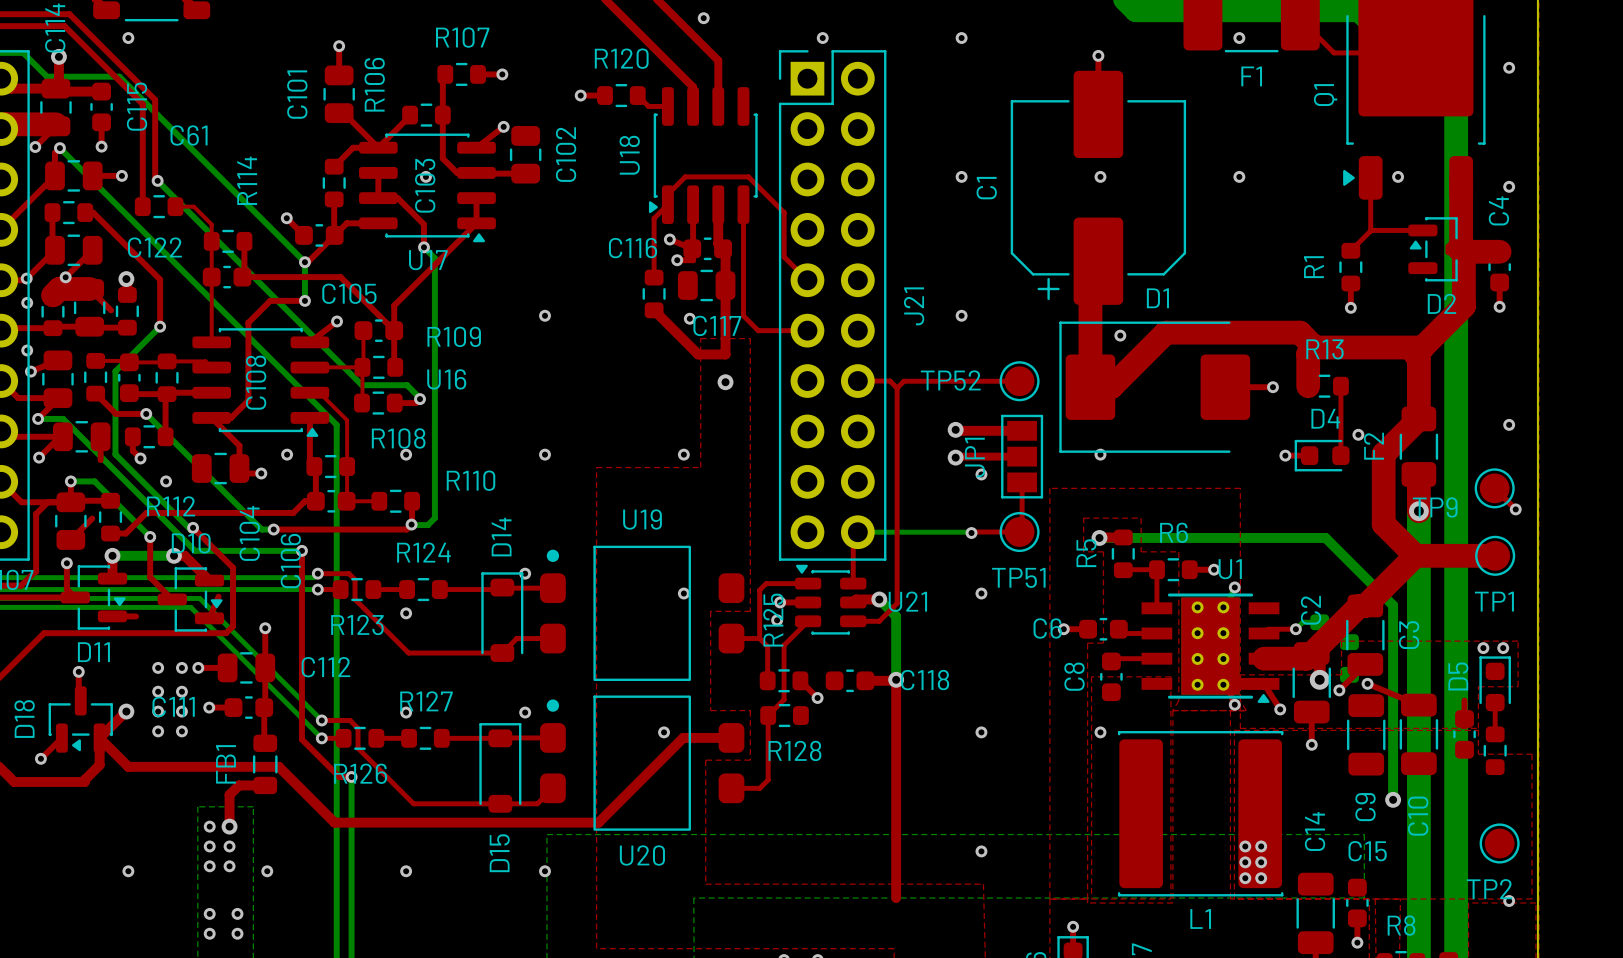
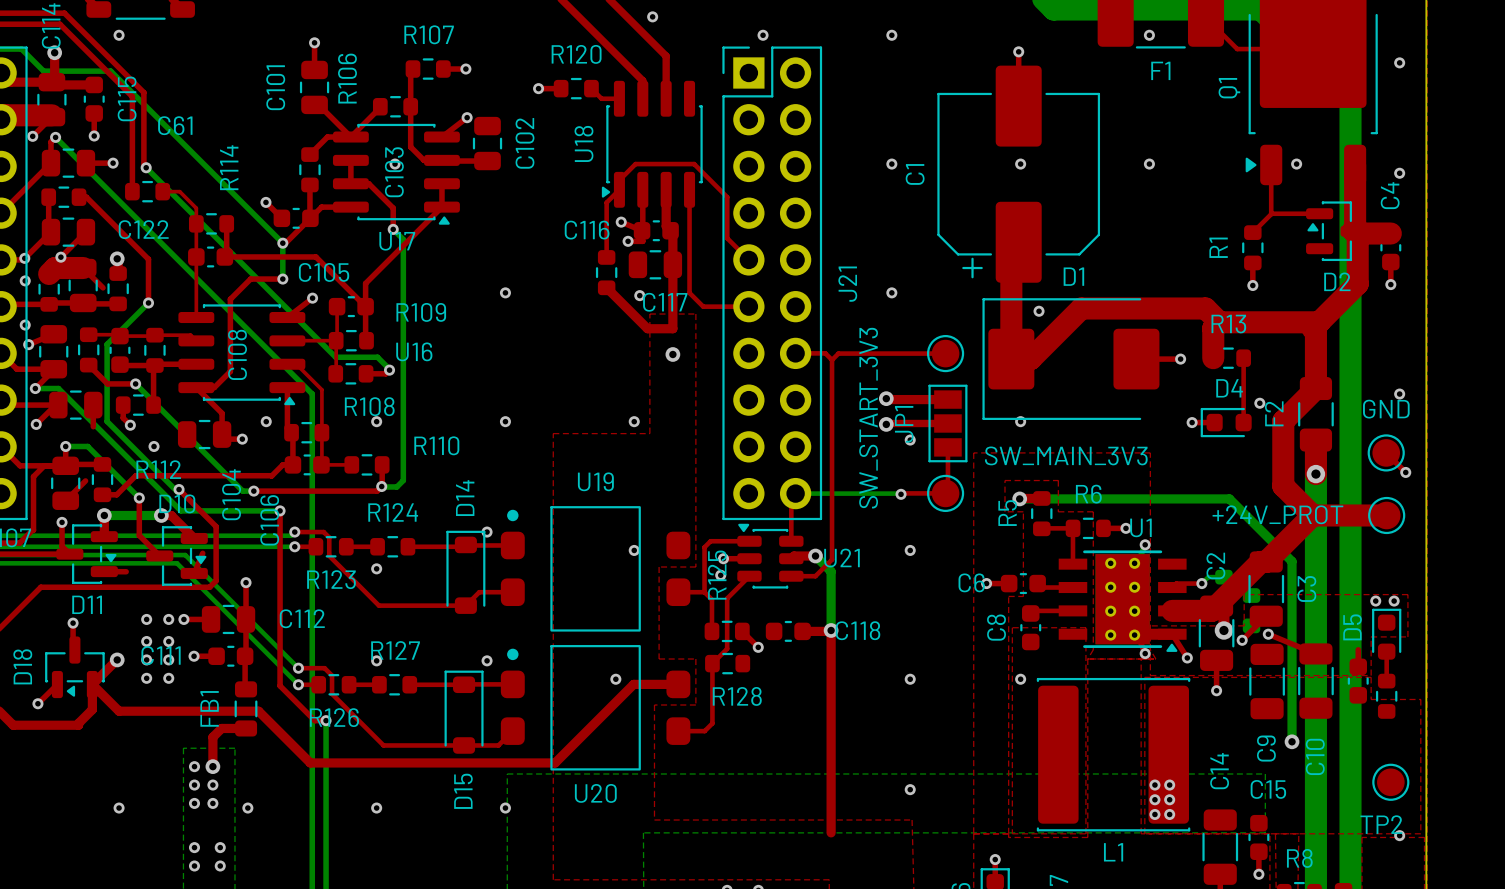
TP52 name: TP52 (950, 380) -> none
TP9 text: none -> GND (1386, 409)
TP52 text: none -> SW_START_3V3 (868, 418)
TP51 text: none -> SW_MAIN_3V3 (1066, 455)
TP9 name: TP9 (1435, 507) -> none
TP1 text: none -> +24V_PROT (1277, 514)
TP51 name: TP51 (1018, 577) -> none
TP1 name: TP1 (1494, 601) -> none

